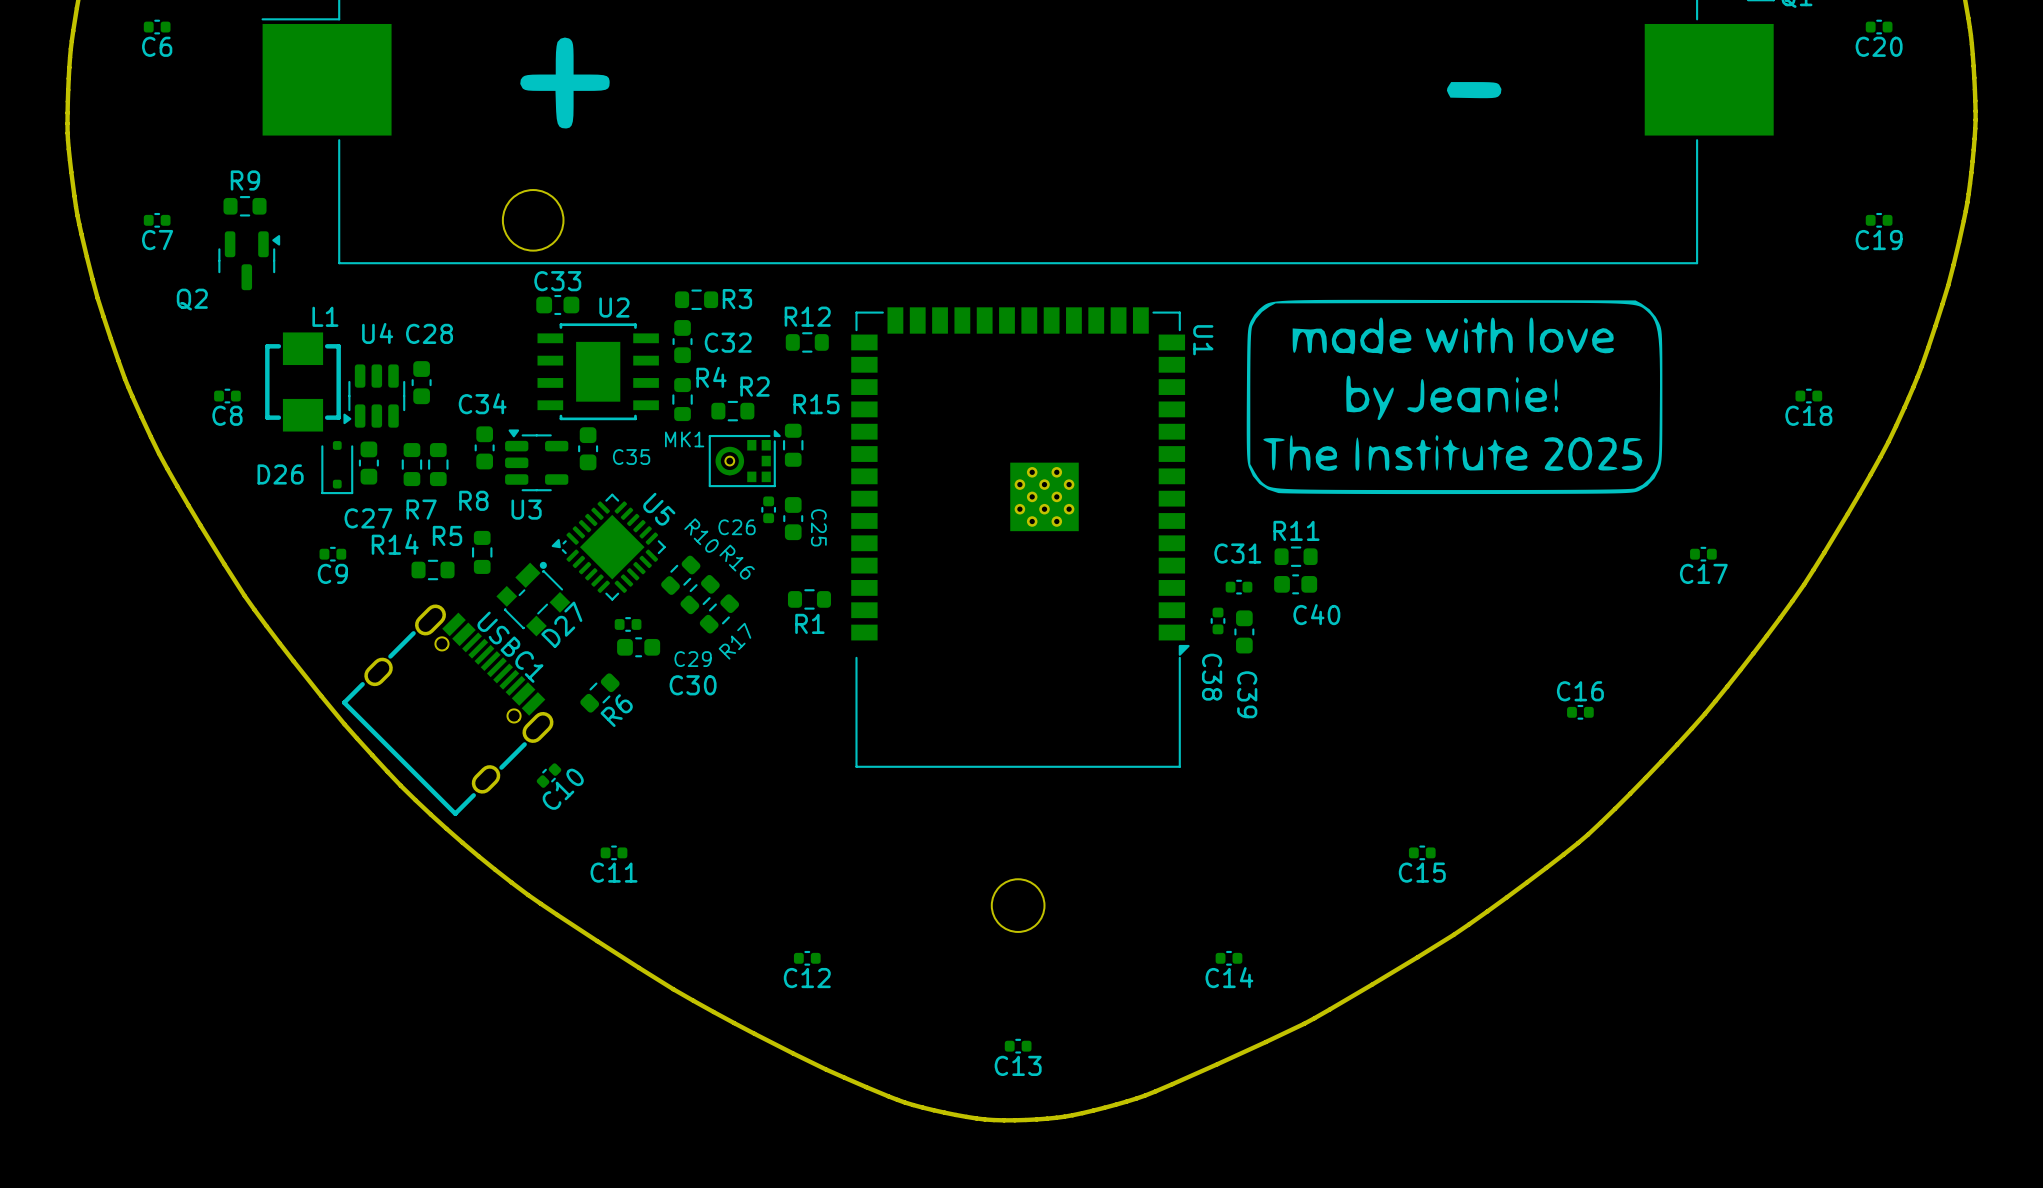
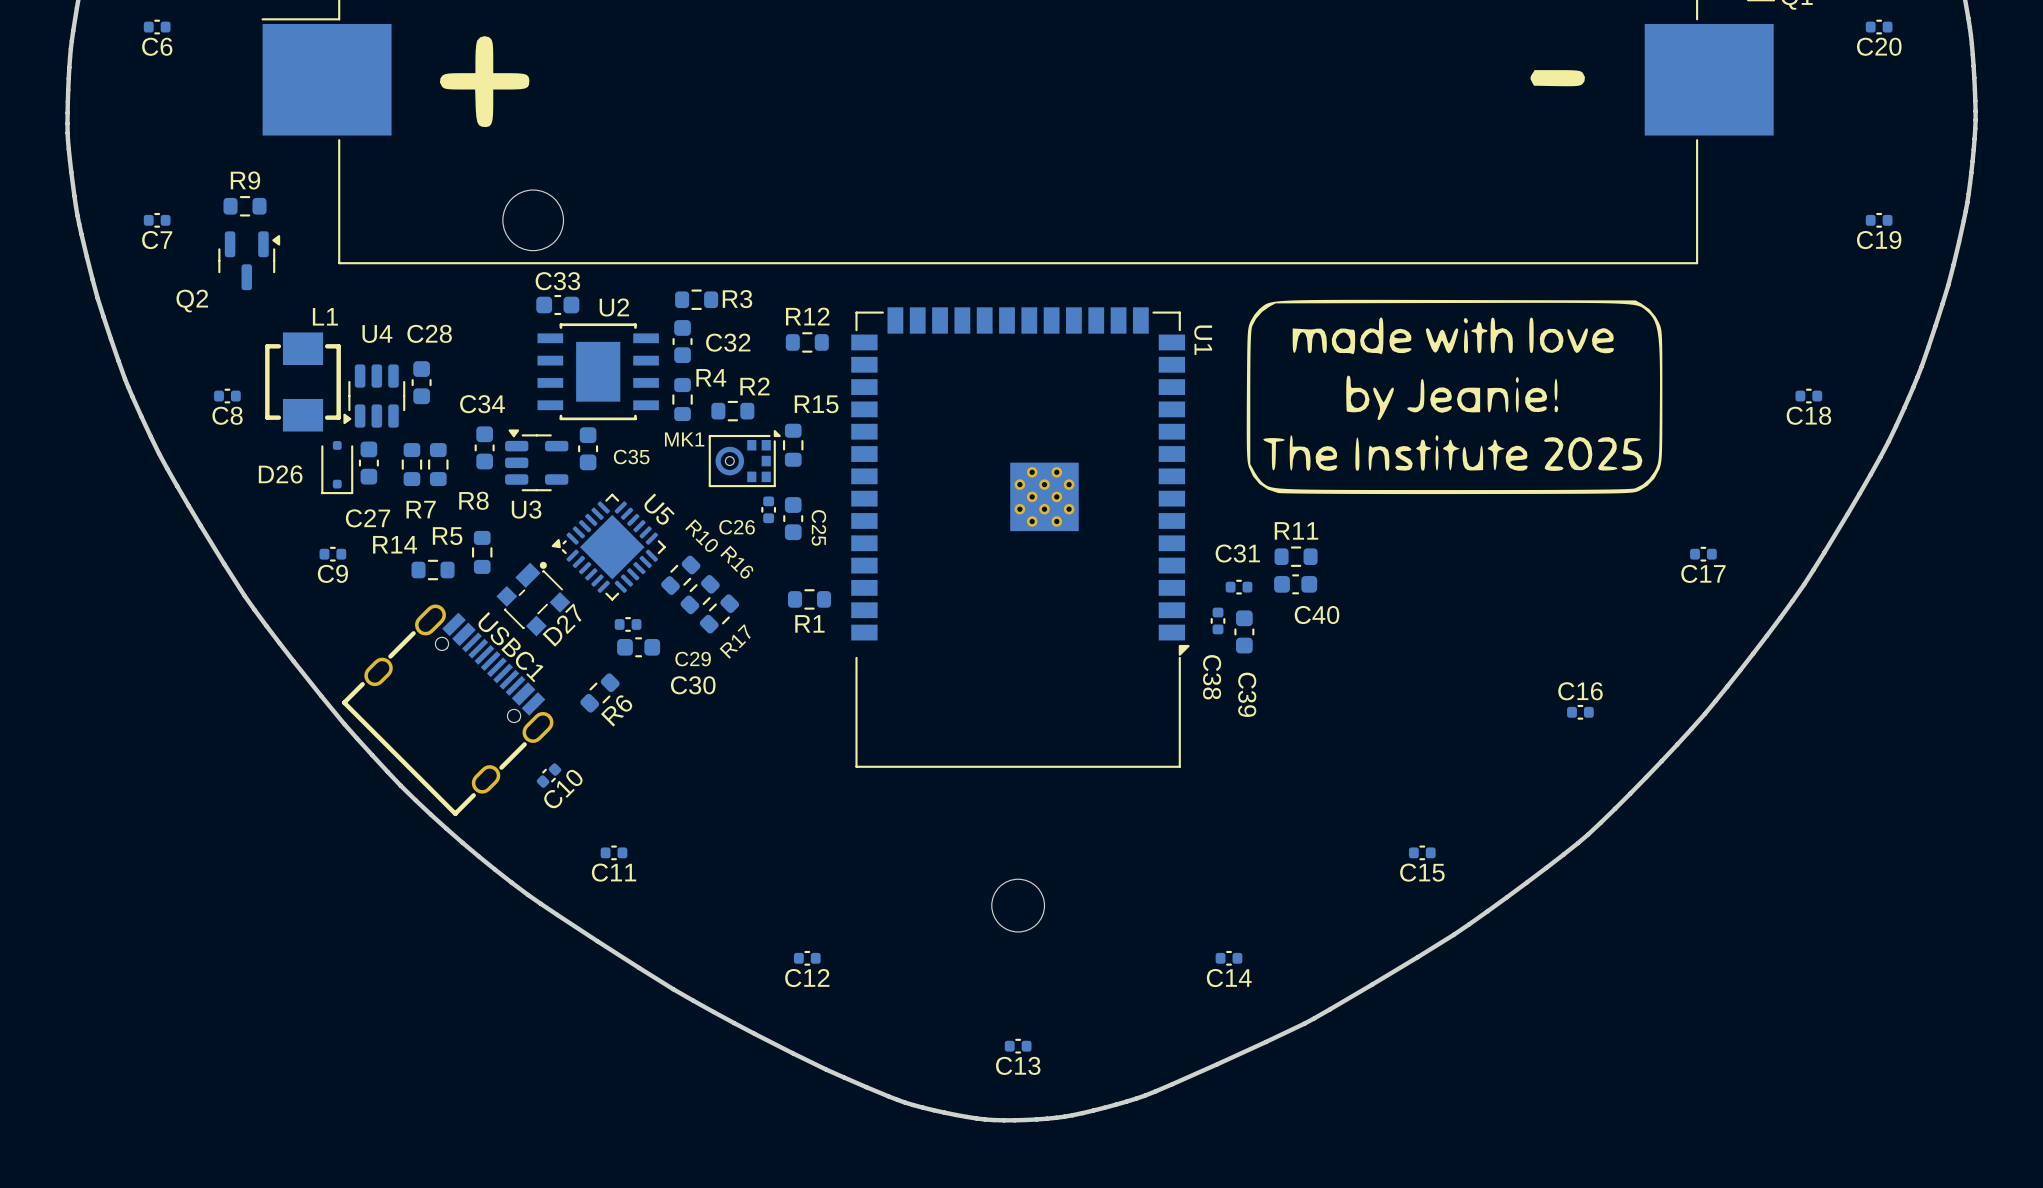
drawing position: (564, 82) -> (484, 81)
drawing position: (1474, 90) -> (1557, 78)

